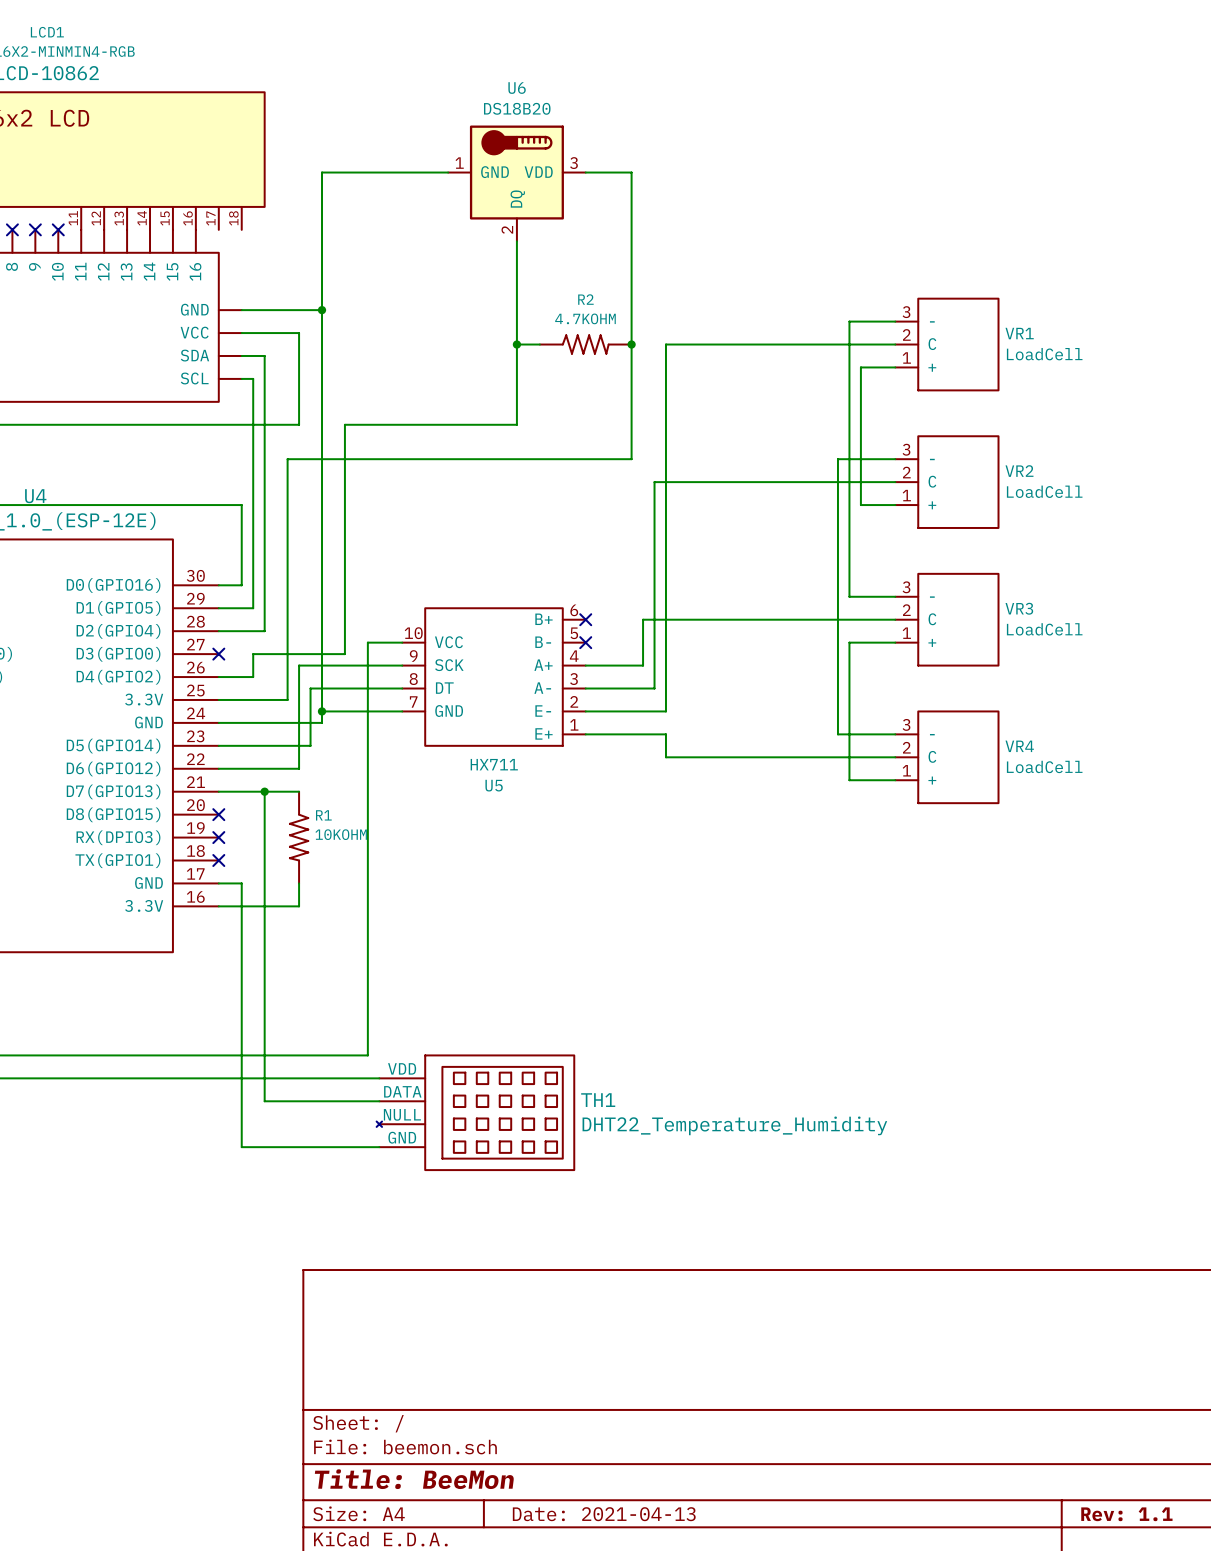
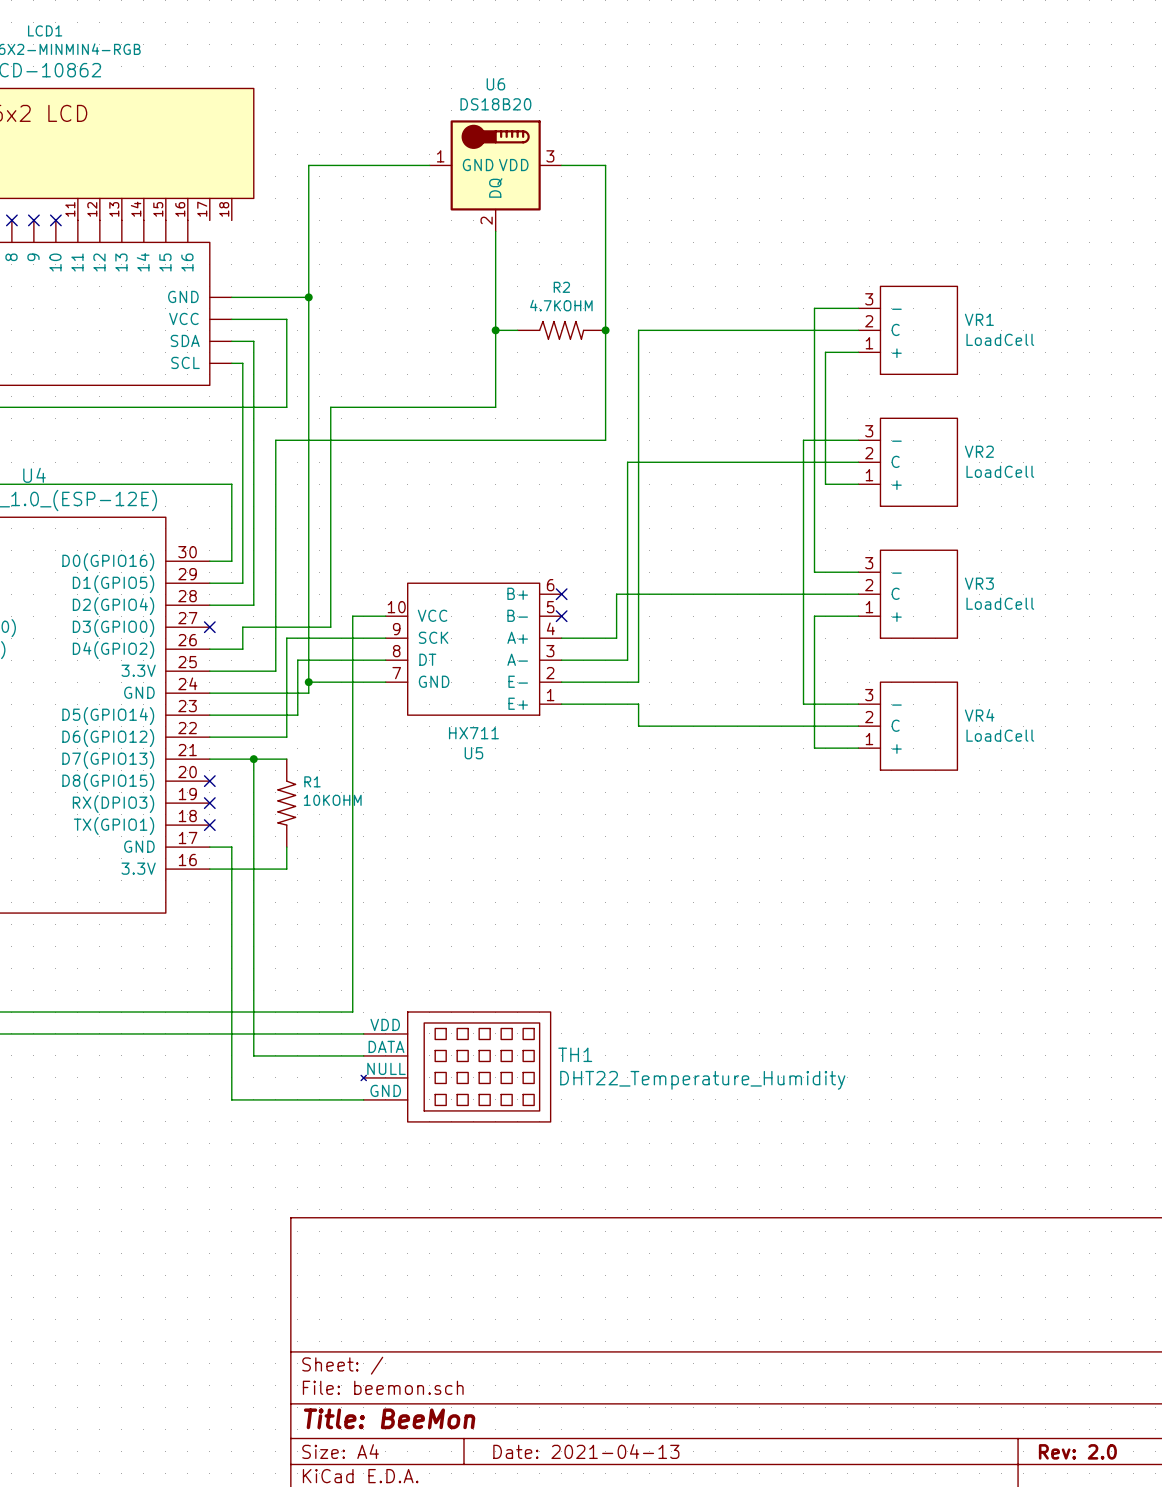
title block: Rev: 1.1 (1126, 1514) -> Rev: 2.0 (1077, 1451)

